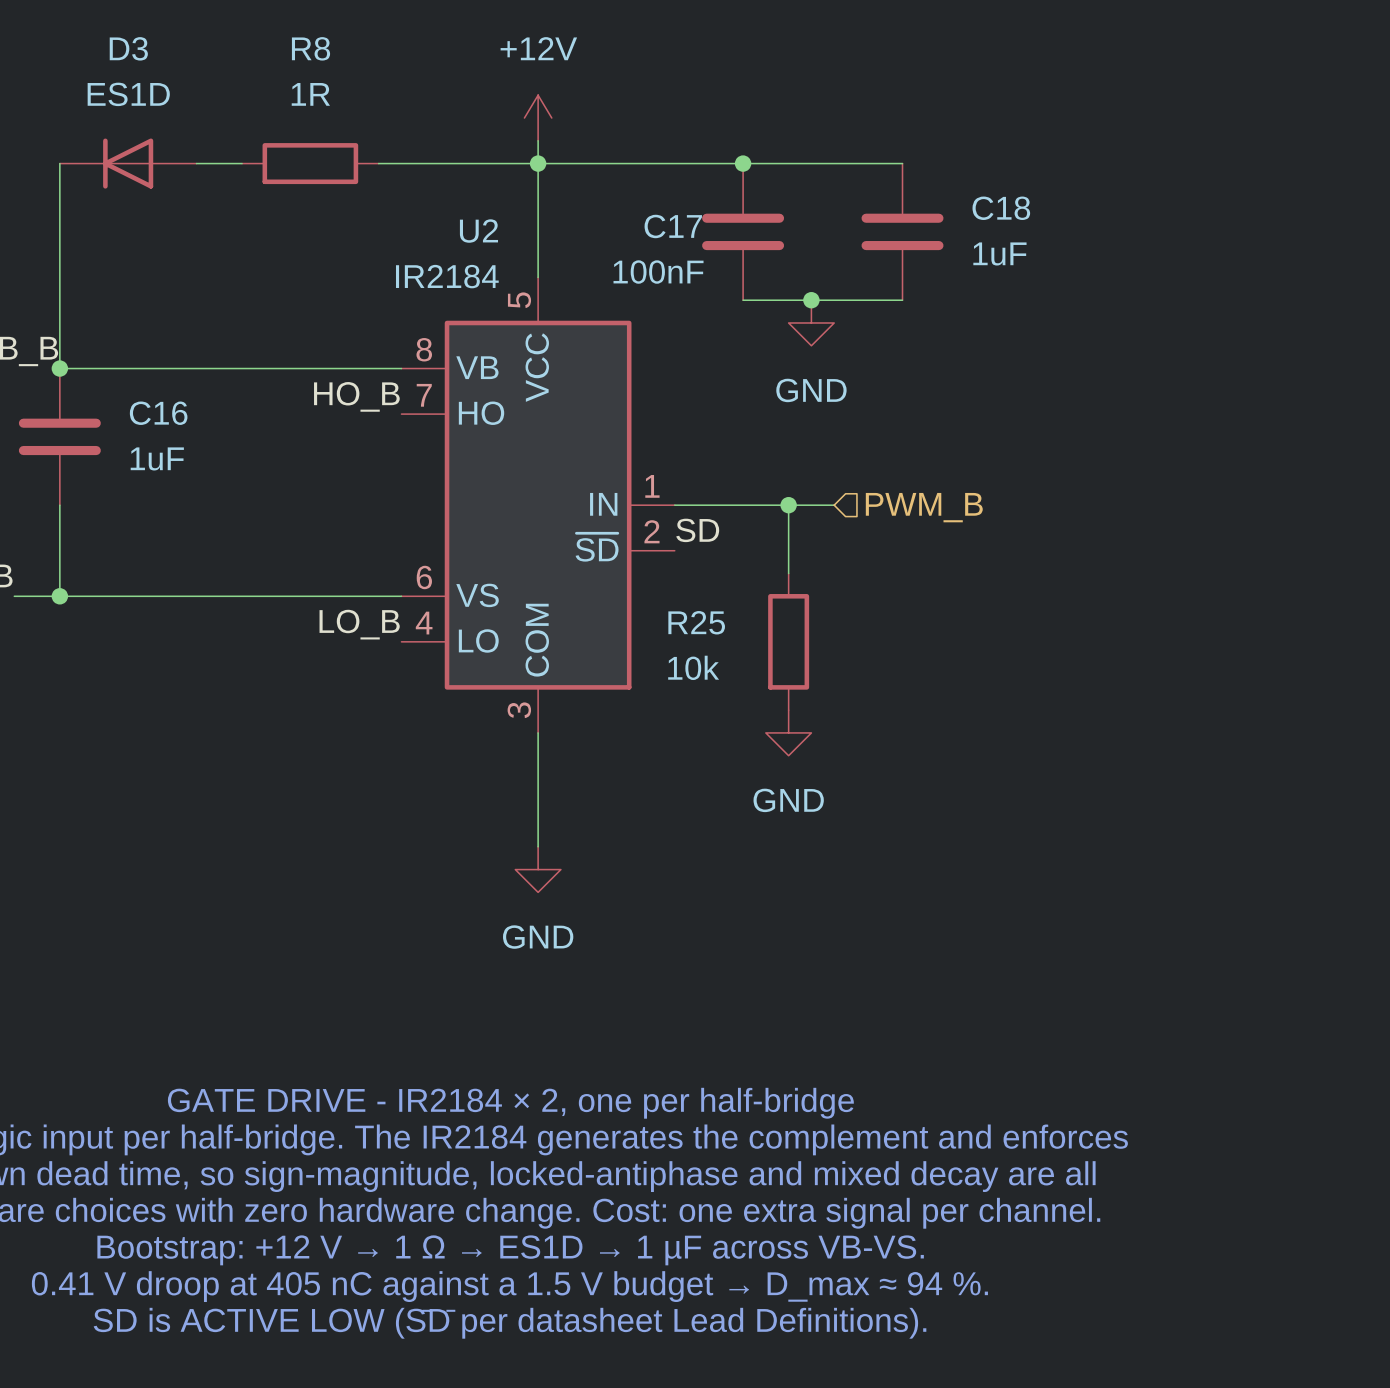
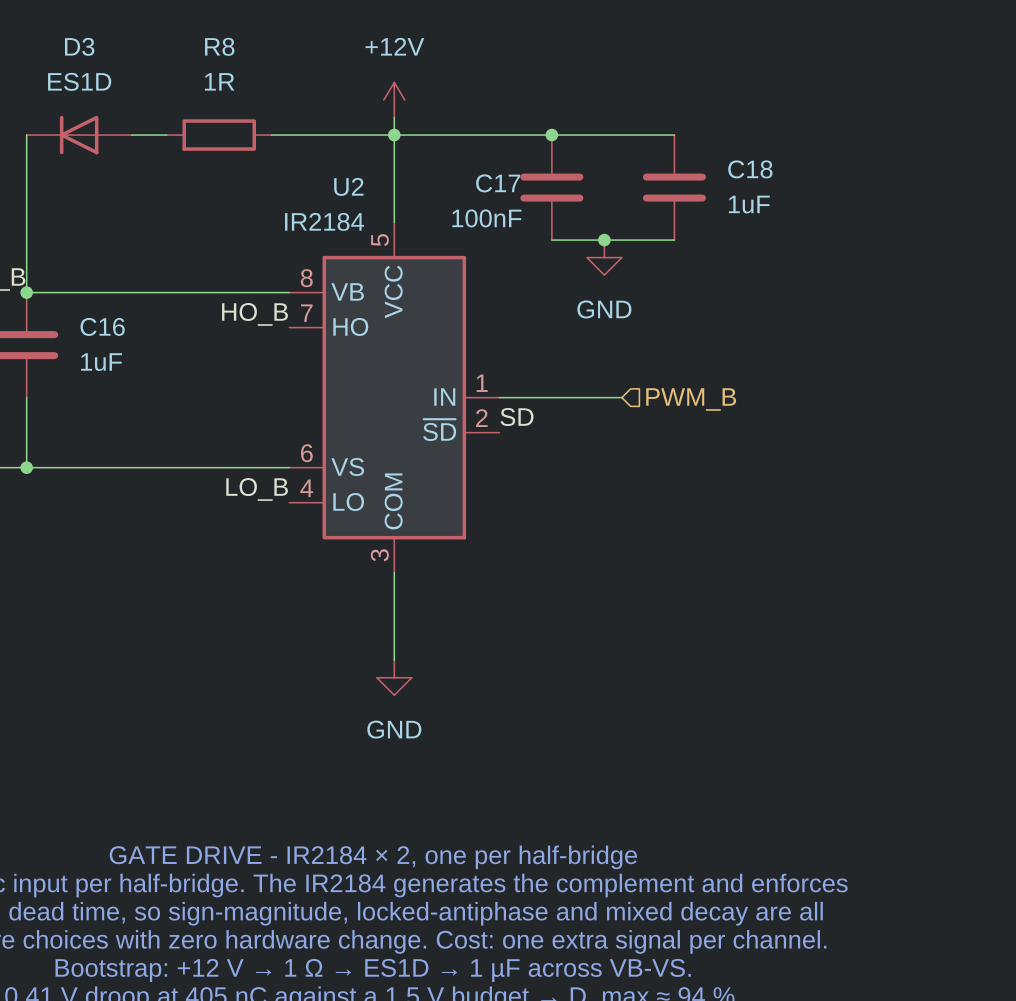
wire: (788, 505) (788, 573) -> none
junction: (788, 505) -> none
R25: 10k (788, 641) -> none
power symbol: GND (788, 732) -> none

